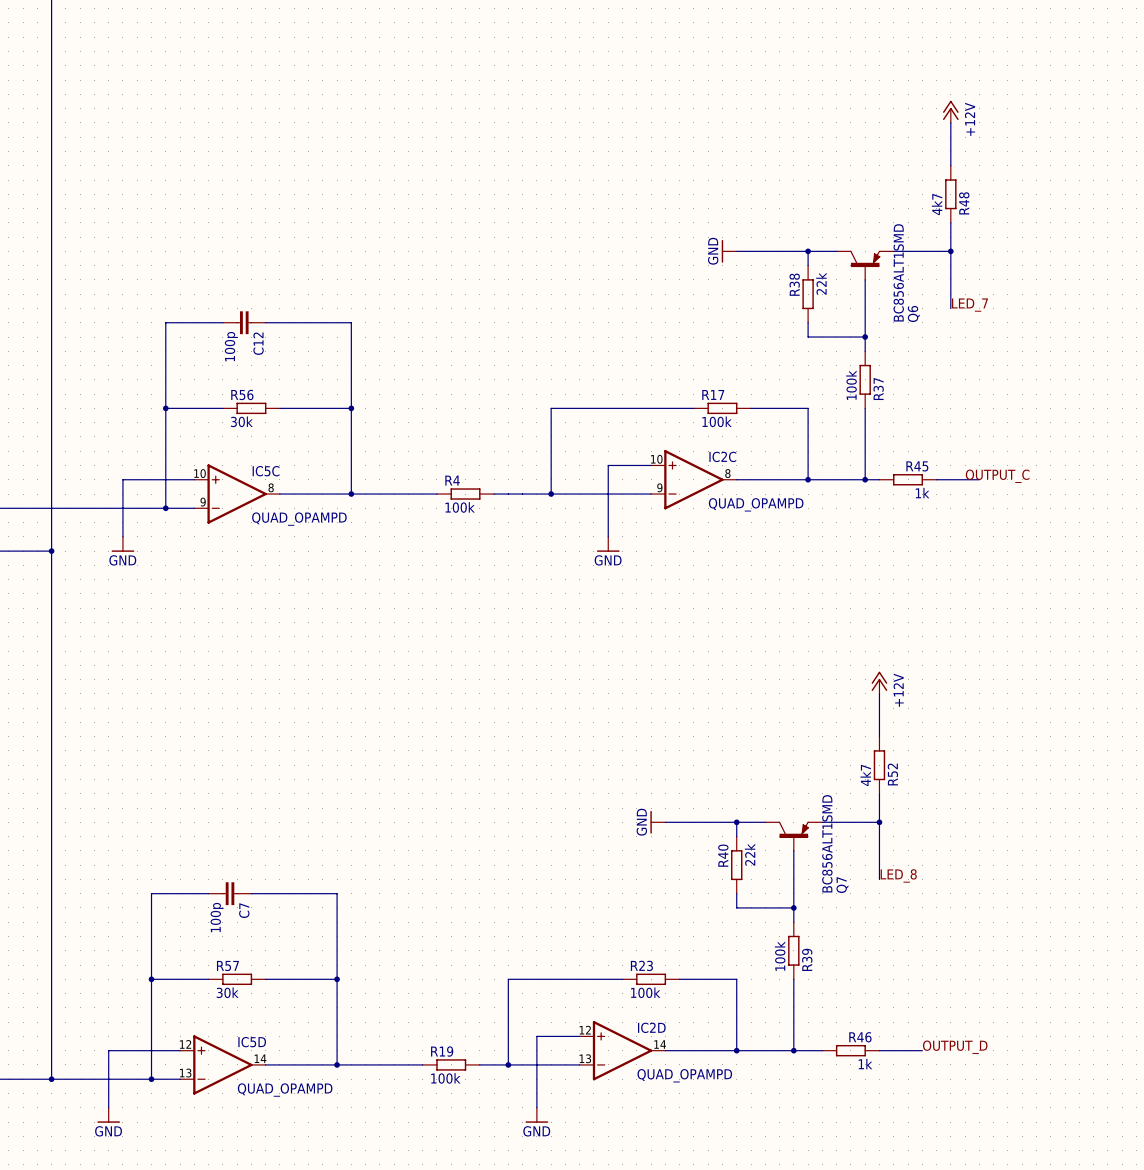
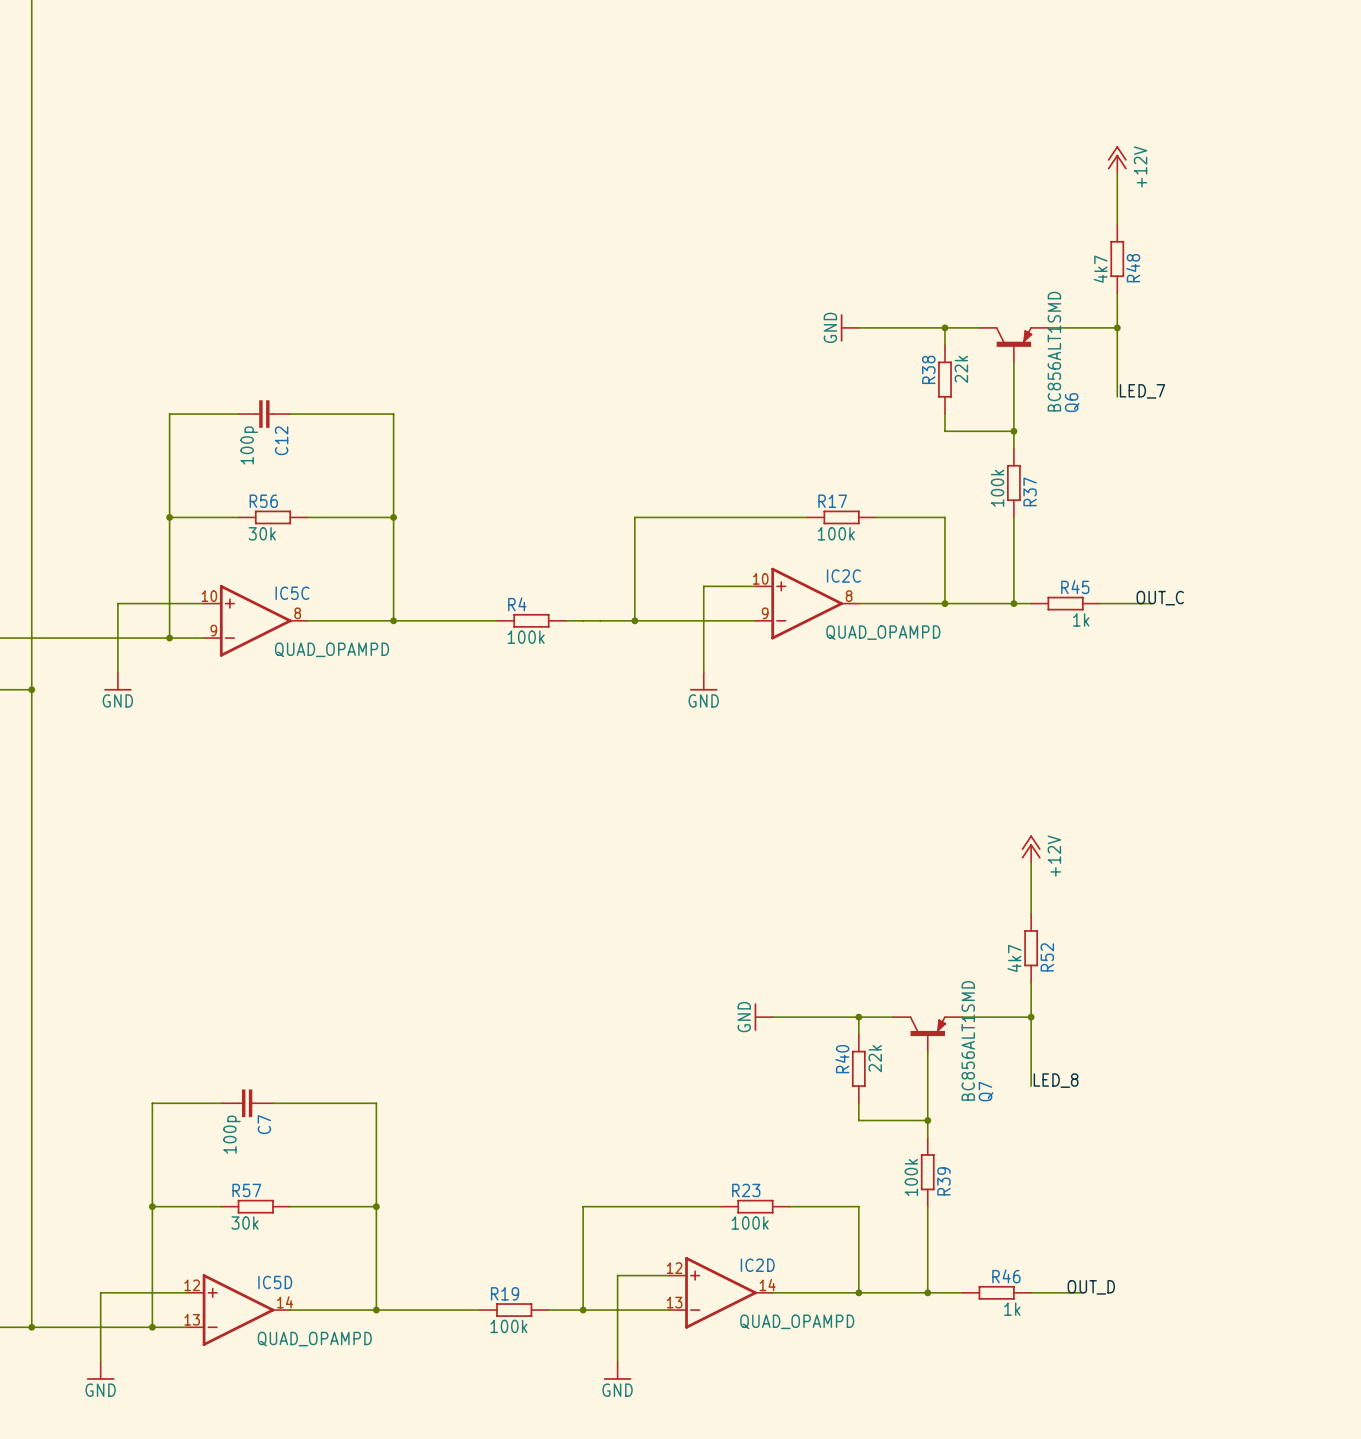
label: OUTPUT_C (997, 476) -> OUT_C (1160, 598)
label: OUTPUT_D (955, 1047) -> OUT_D (1091, 1287)

